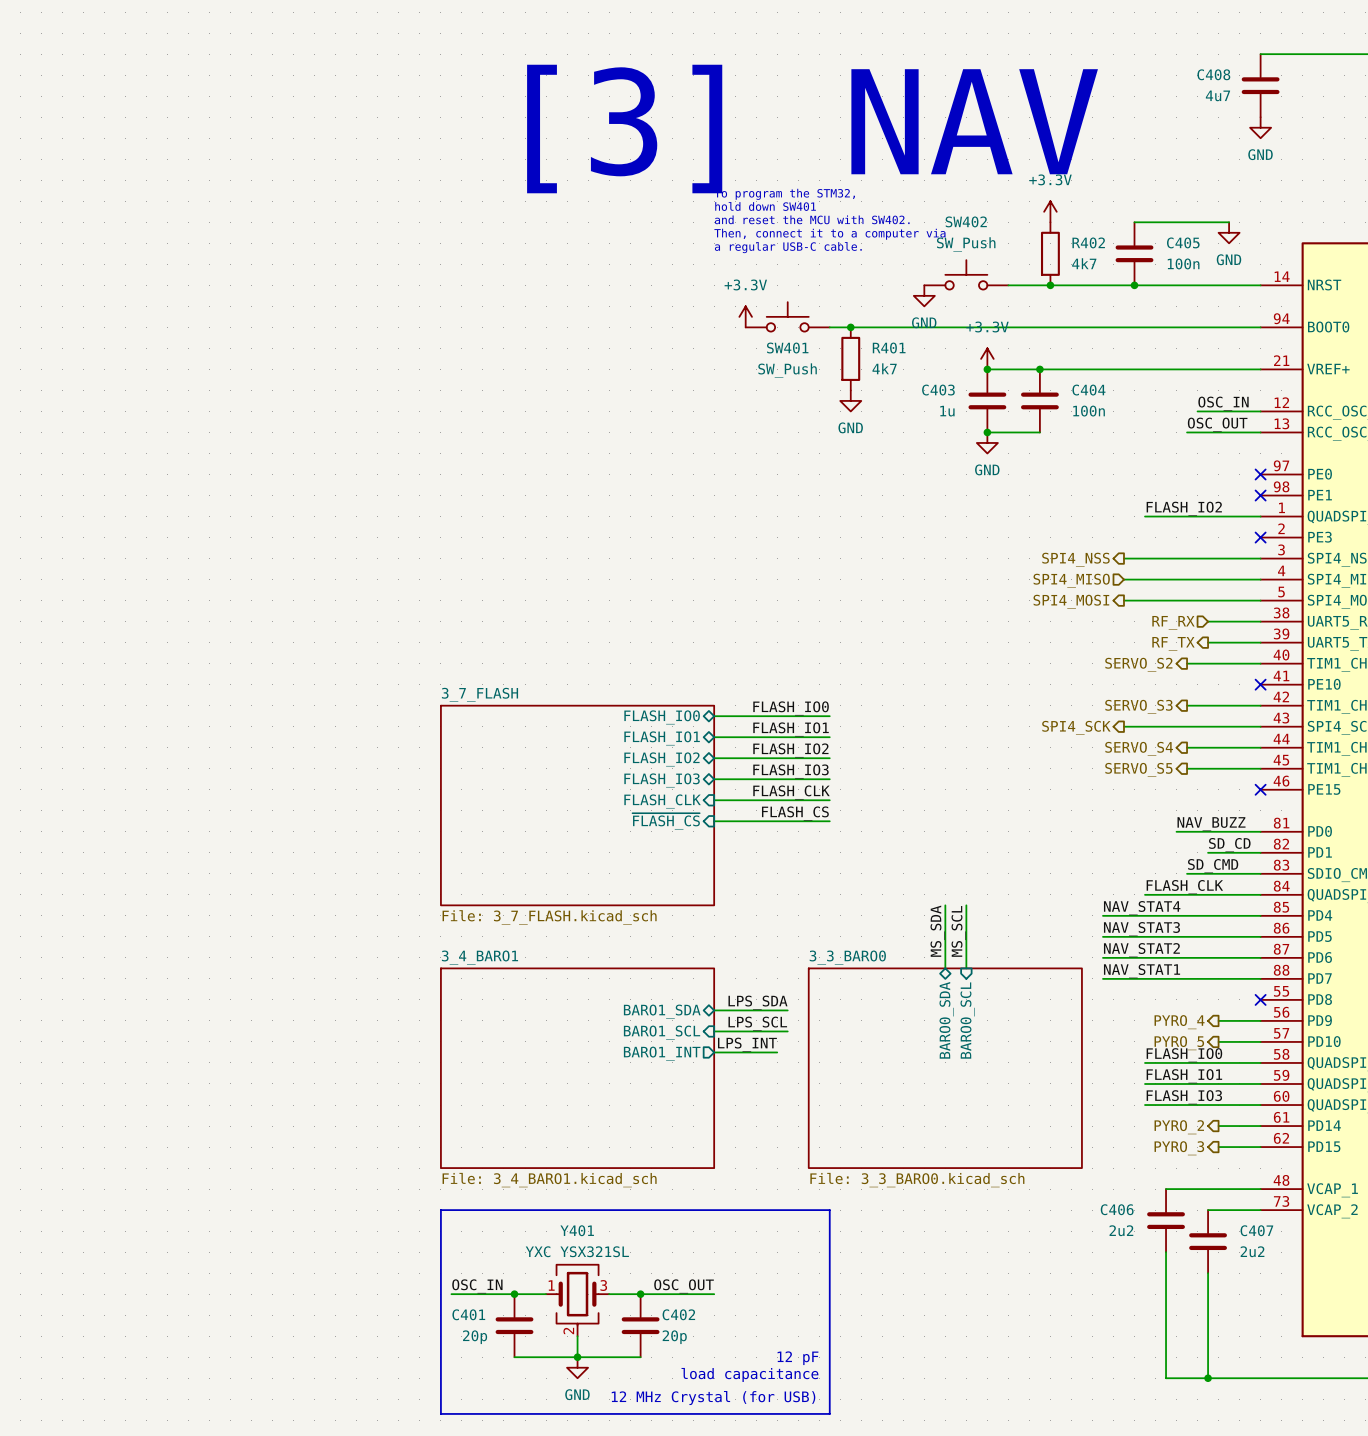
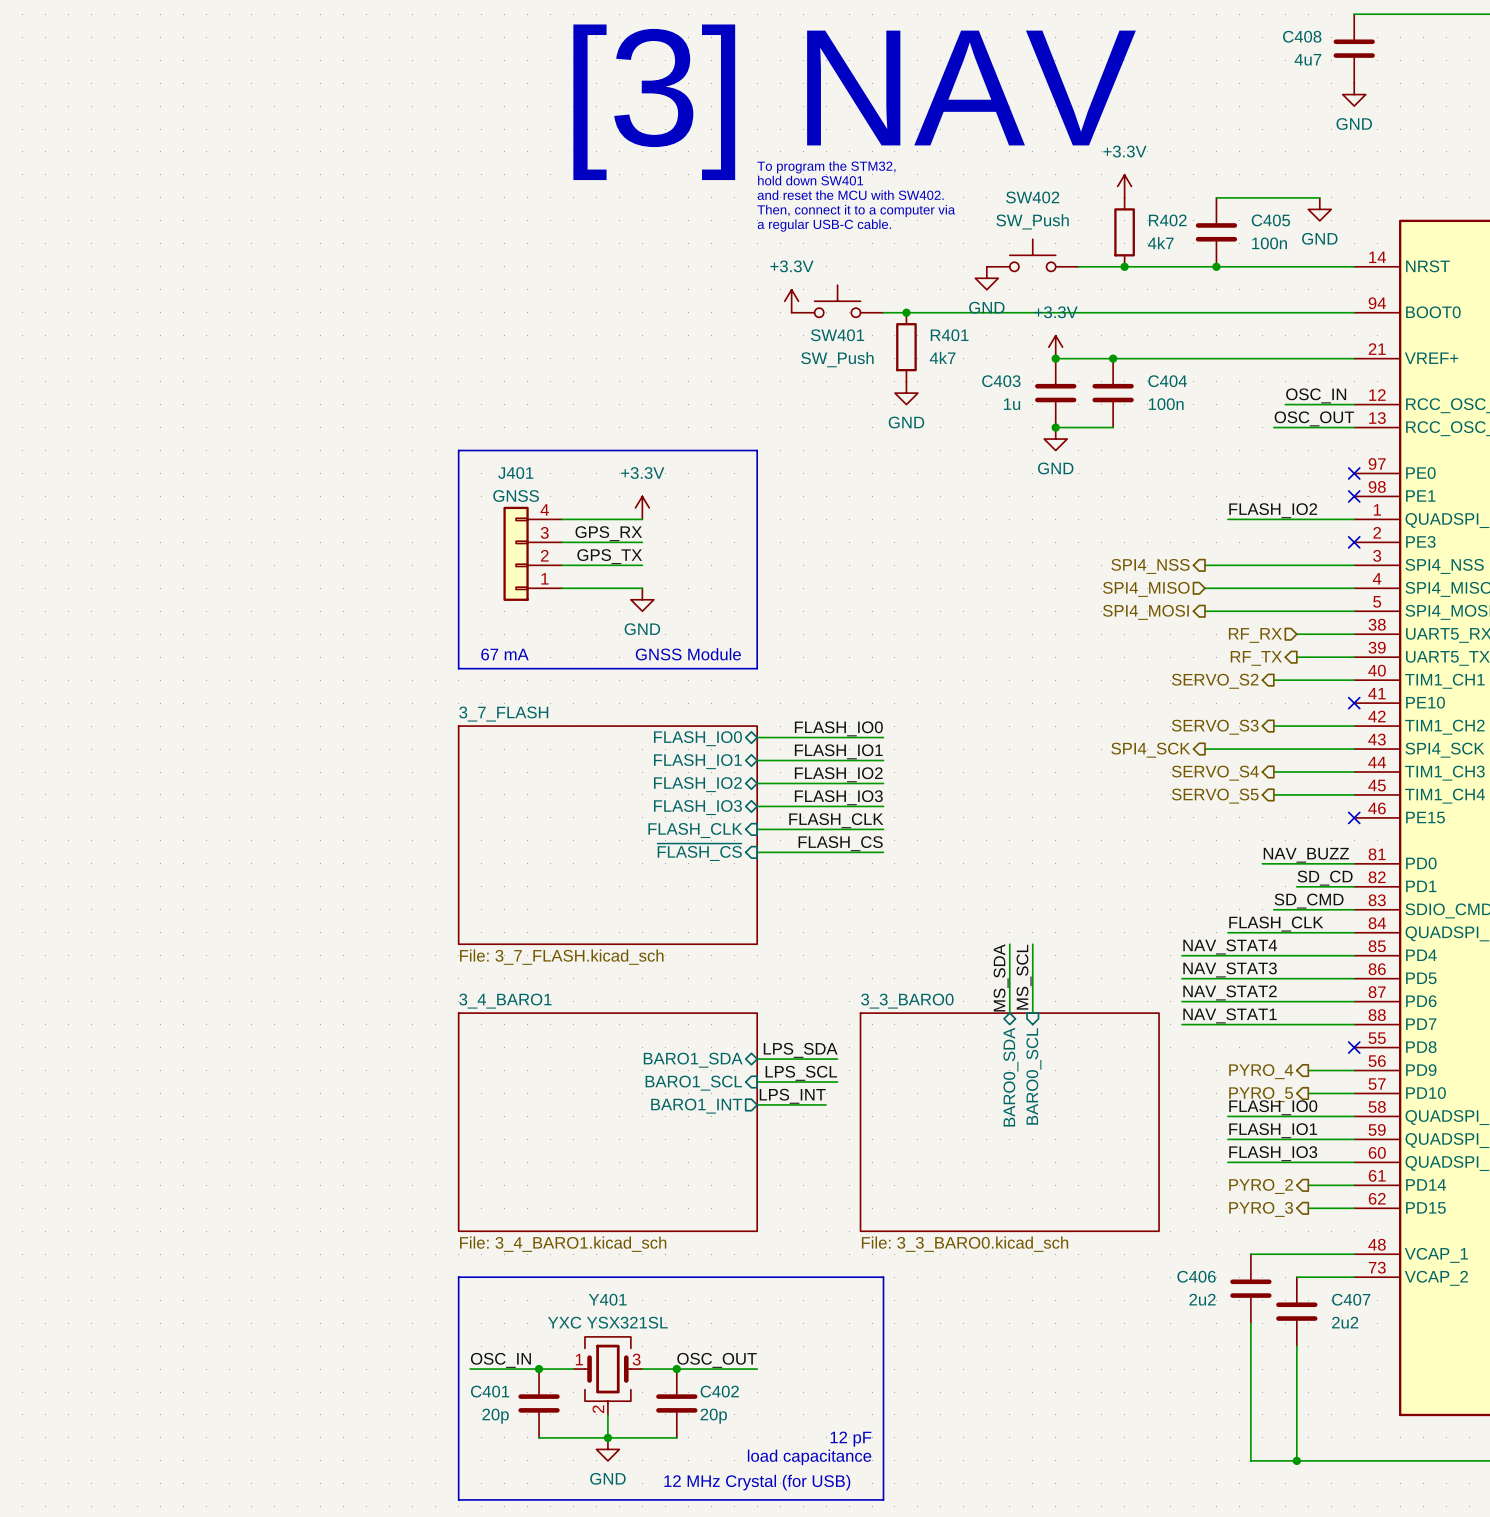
line: none -> (458, 450) (757, 450) (757, 668) (458, 668) (458, 450)
power symbol: none -> +3.3V (642, 507)
wire: none -> (561, 519) (642, 519)
label: none -> GPS_RX (608, 533)
wire: none -> (561, 542) (642, 542)
J401: none -> GNSS (532, 553)
label: none -> GPS_TX (609, 556)
wire: none -> (561, 565) (642, 565)
wire: none -> (561, 588) (642, 588)
power symbol: none -> GND (642, 599)
text: none -> 67 mA (504, 654)
text: none -> GNSS Module (688, 654)

